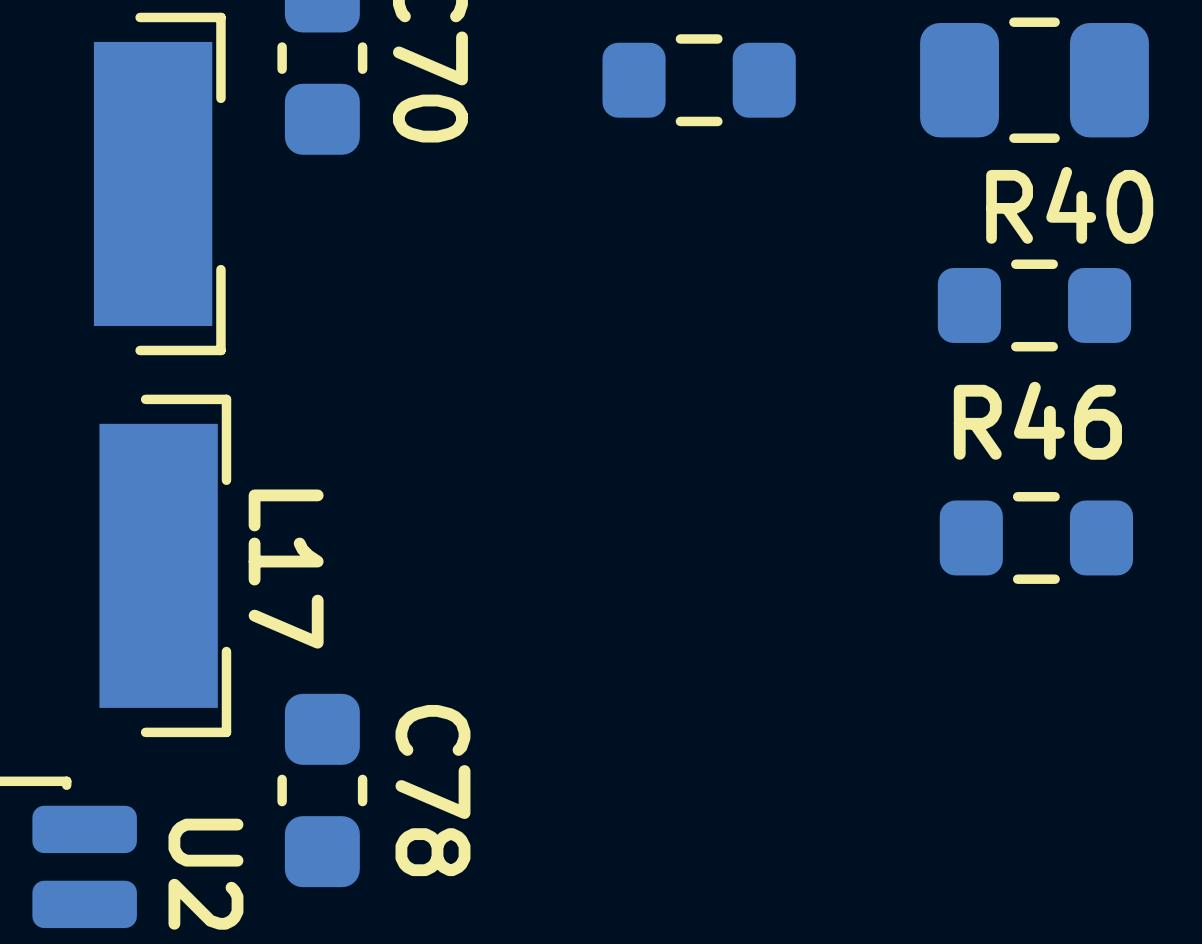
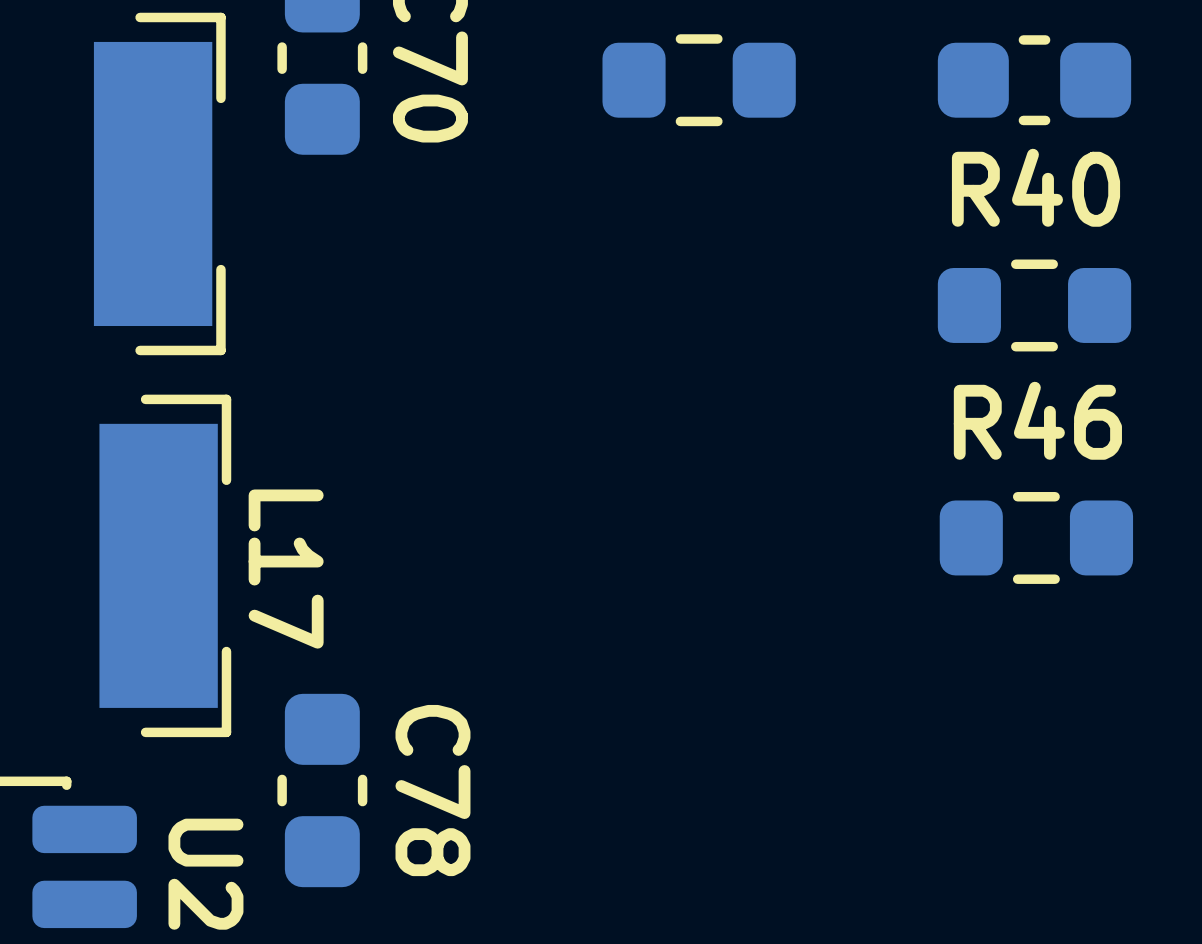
part footprint: [920, 17, 1149, 143] -> [937, 35, 1132, 126]
R40 name position: R40 (1069, 205) -> R40 (1036, 187)

